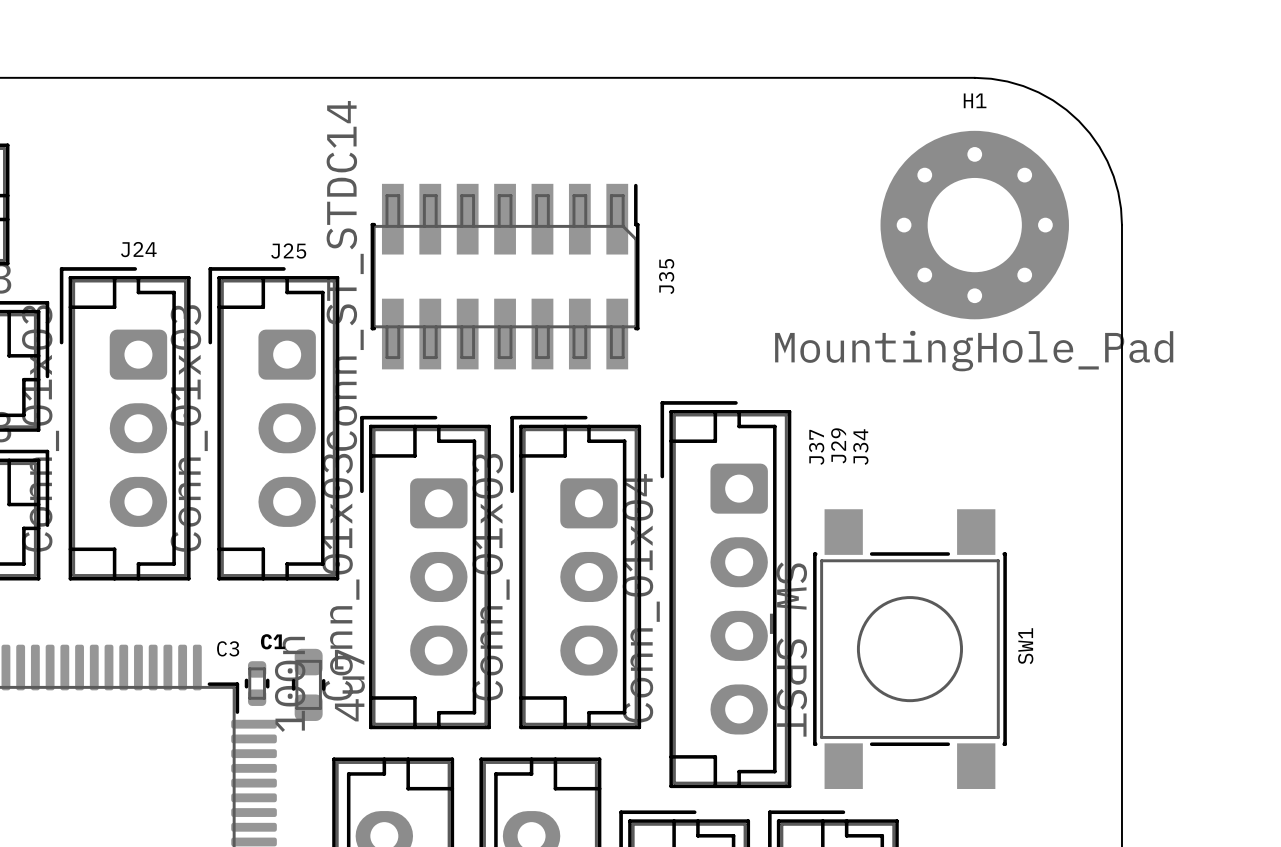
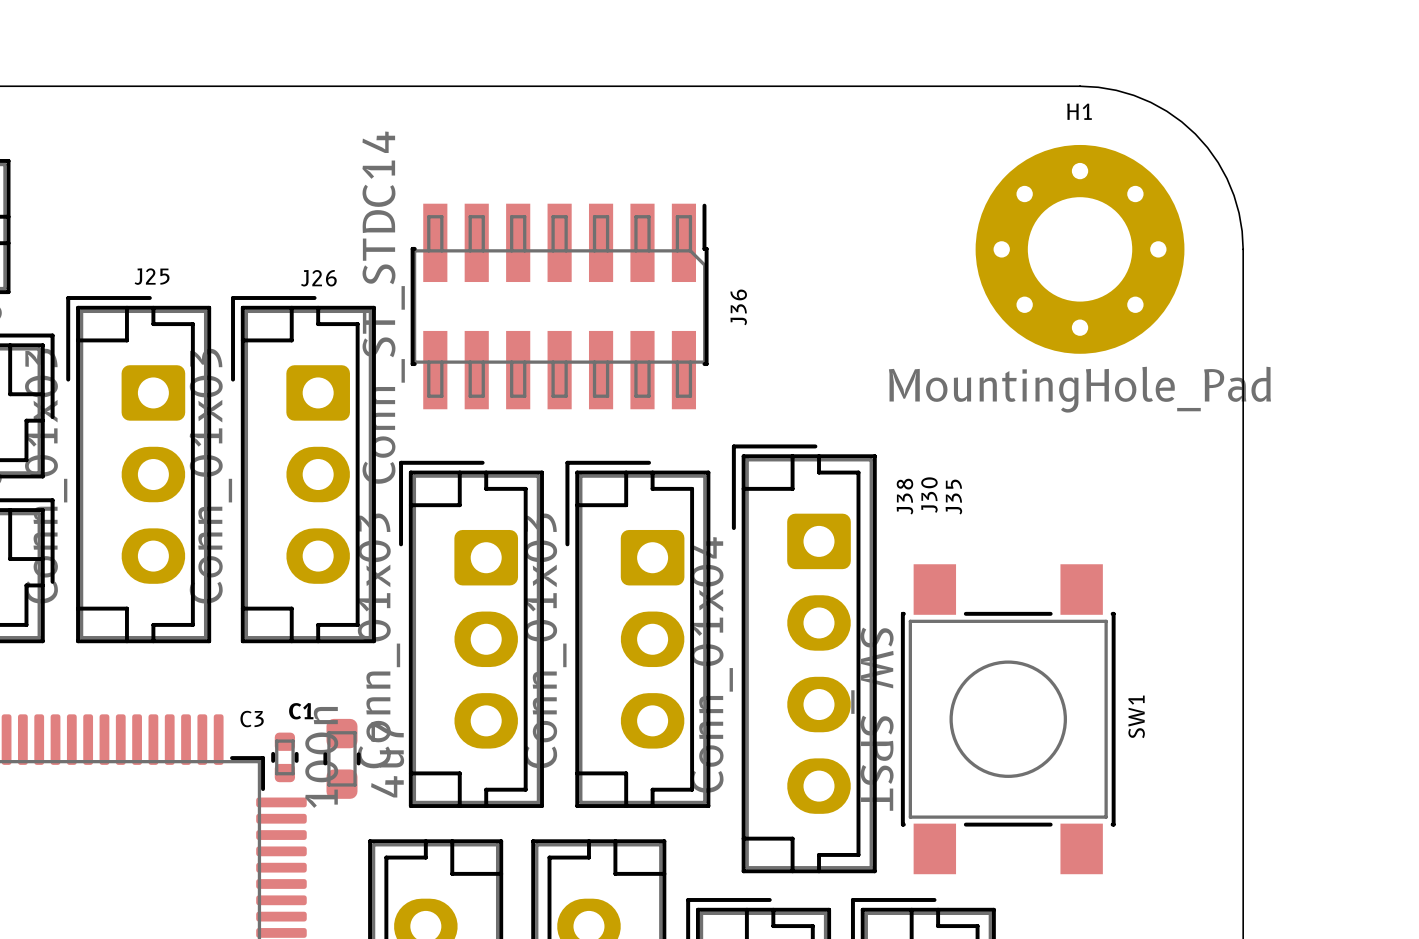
J24 name: J24 (138, 249) -> J25 (152, 276)
J25 name: J25 (288, 251) -> J26 (318, 278)
J35 name: J35 (666, 276) -> J36 (738, 307)
J29 name: J29 (838, 445) -> J30 (929, 495)
J37 name: J37 (816, 447) -> J38 (904, 496)
J34 name: J34 (860, 447) -> J35 (953, 497)

